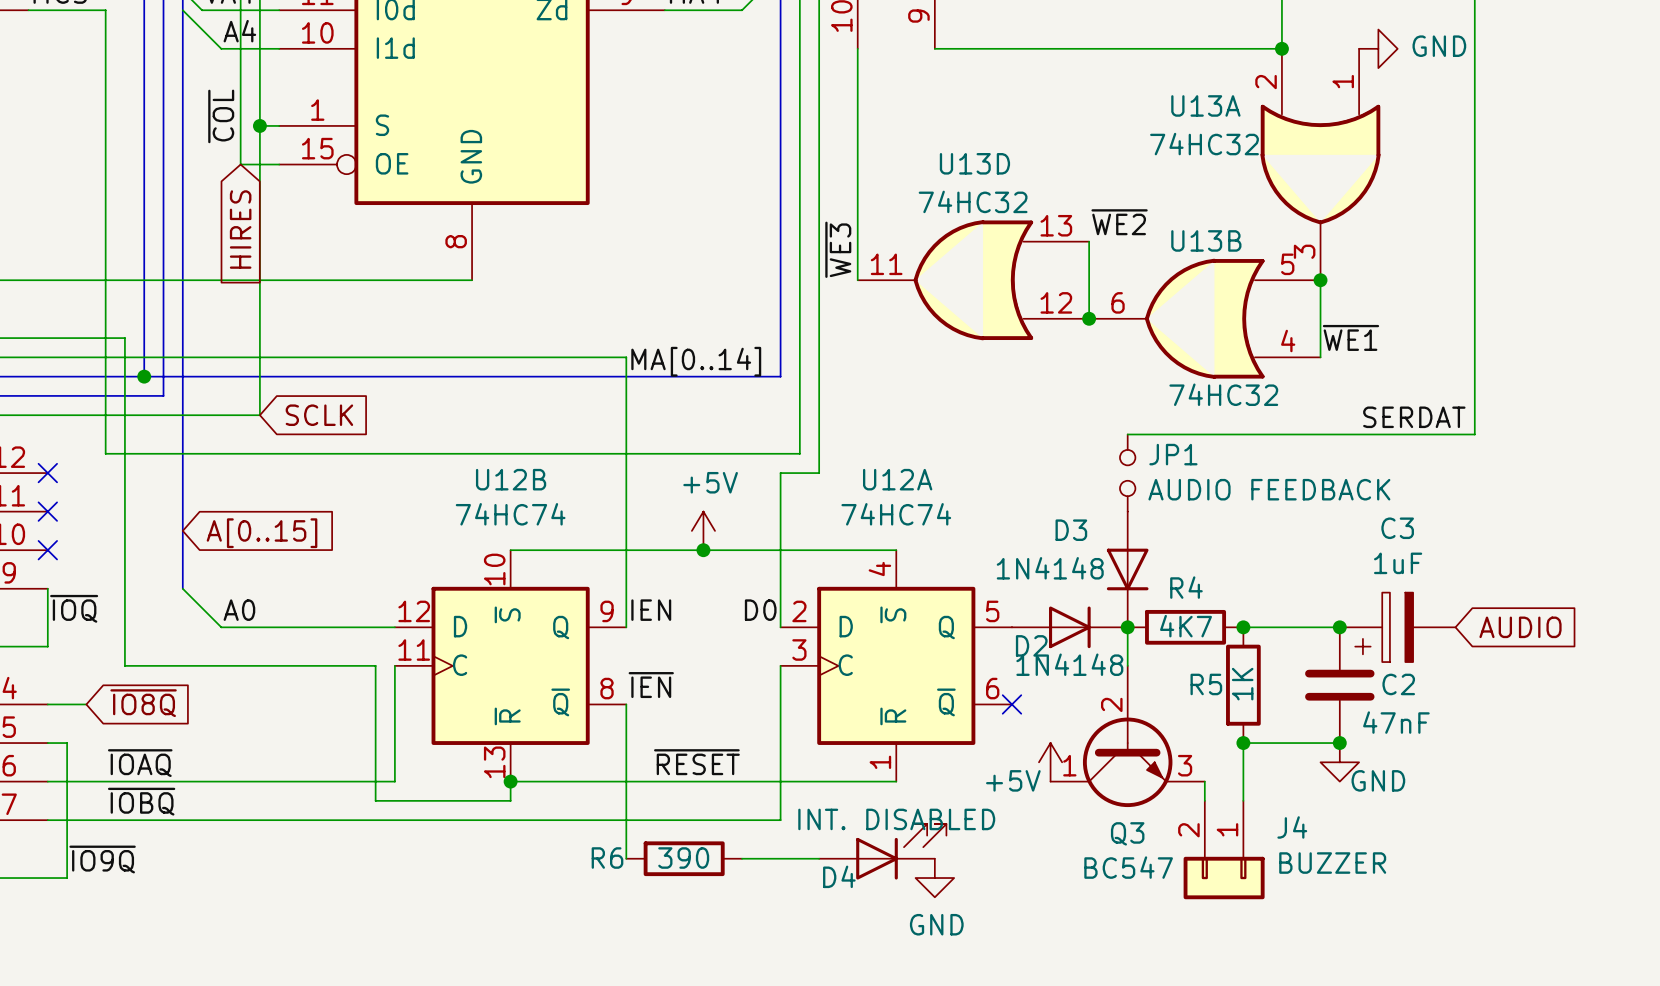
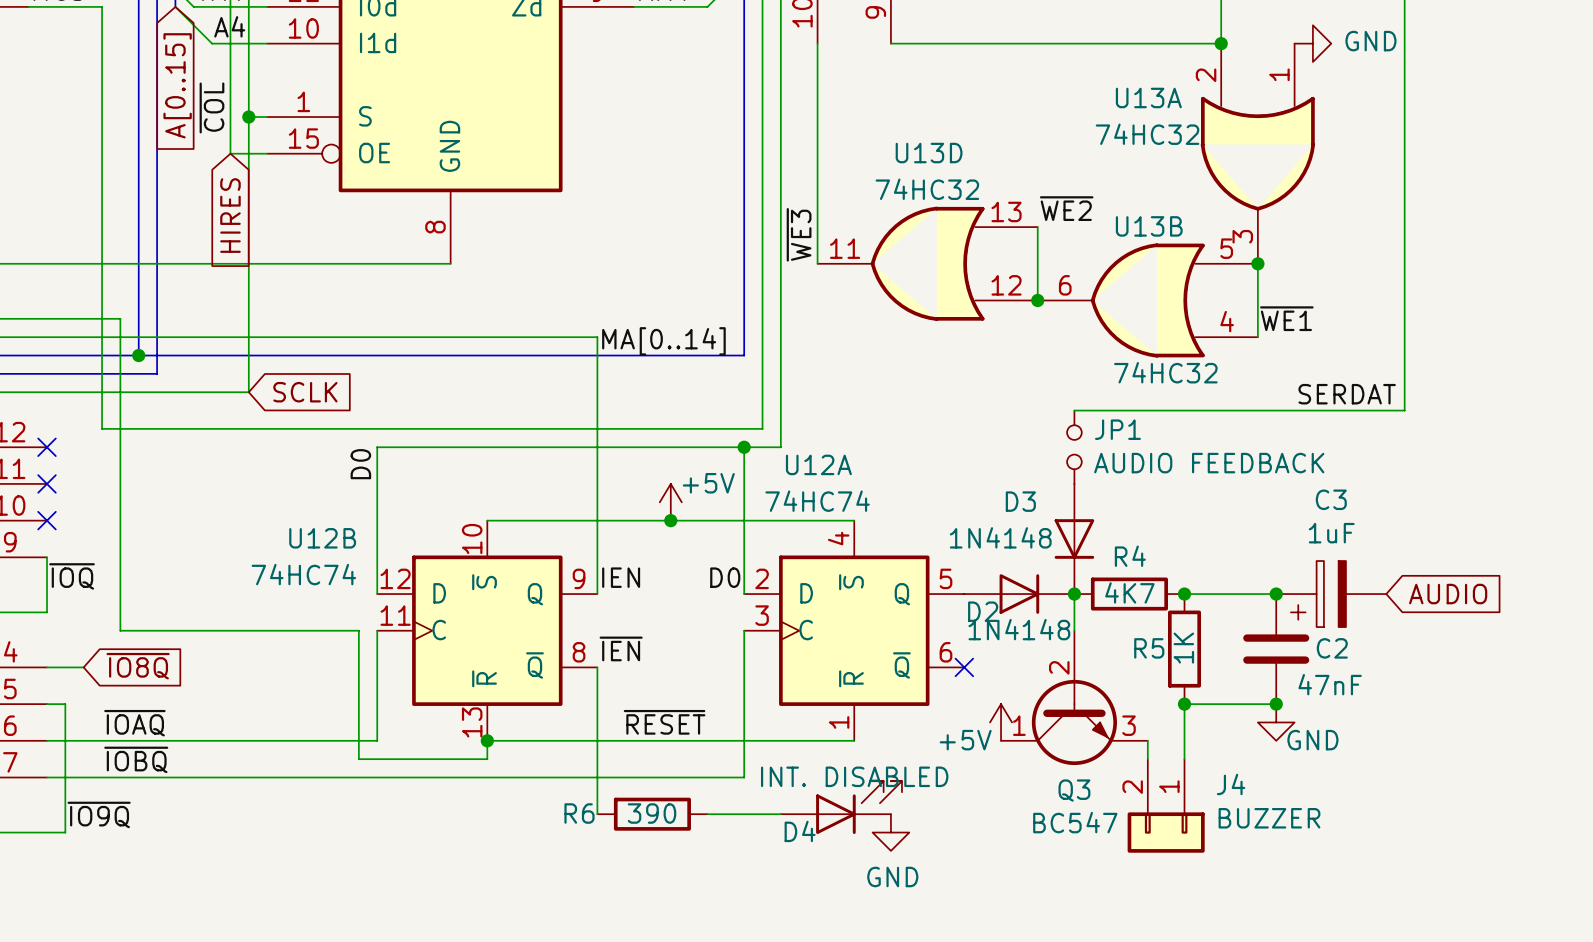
bus: (182, 10) (182, 588) -> none
global label: none -> A[0..15] (177, 85)
junction: none -> (744, 447)
U12B name position: U12B (511, 479) -> U12B (322, 538)
U12A name position: U12A (897, 479) -> U12A (818, 464)
power symbol text position: +5V (710, 482) -> +5V (708, 483)
label: none -> D0 (360, 464)
U12B value position: 74HC74 (510, 514) -> 74HC74 (303, 574)
U12A value position: 74HC74 (896, 514) -> 74HC74 (817, 501)
global label: A[0..15] (262, 533) -> none
wire: (182, 588) (221, 627) (394, 627) -> (744, 447) (377, 447) (377, 594)
label: A0 (239, 610) -> none

